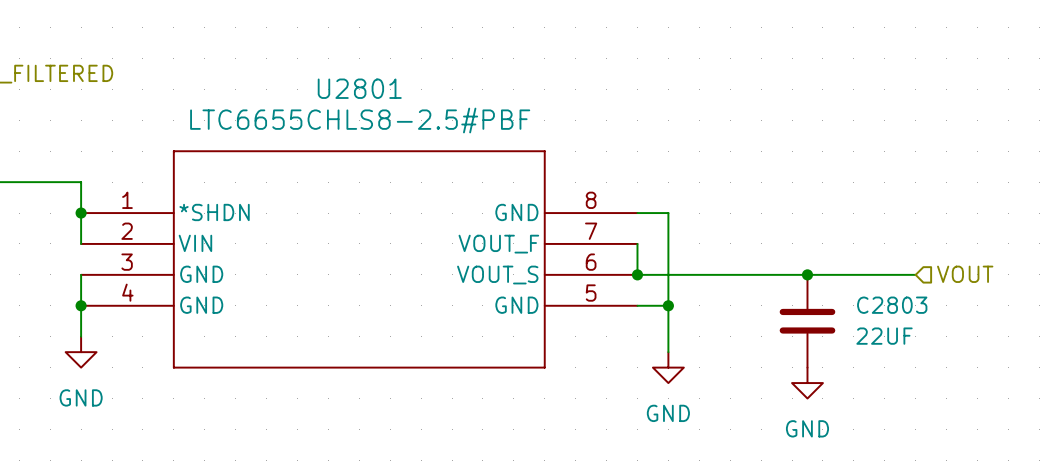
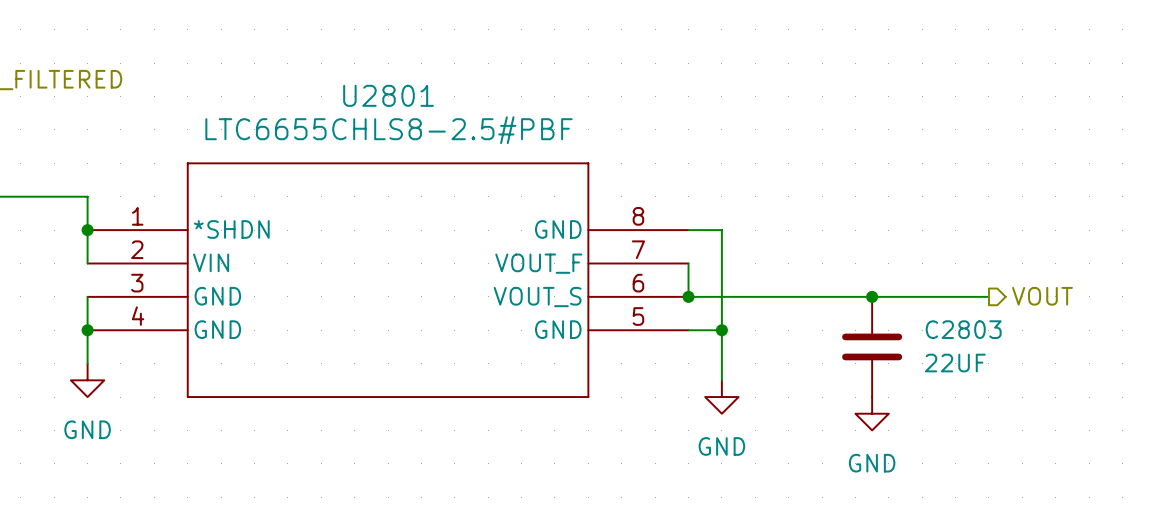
hierarchical label shape: input (965, 274) -> output (1042, 296)

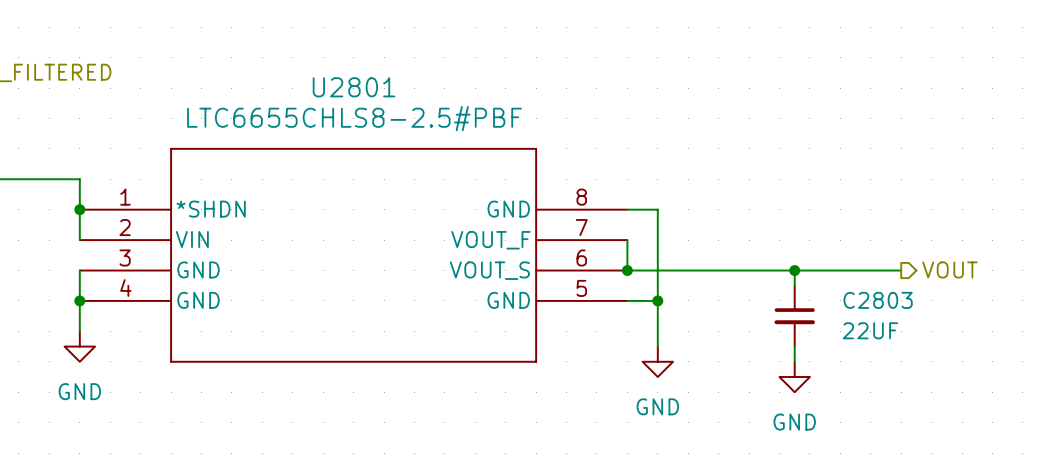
C2803 symbol: [842, 296, 903, 398] -> [774, 285, 815, 347]

